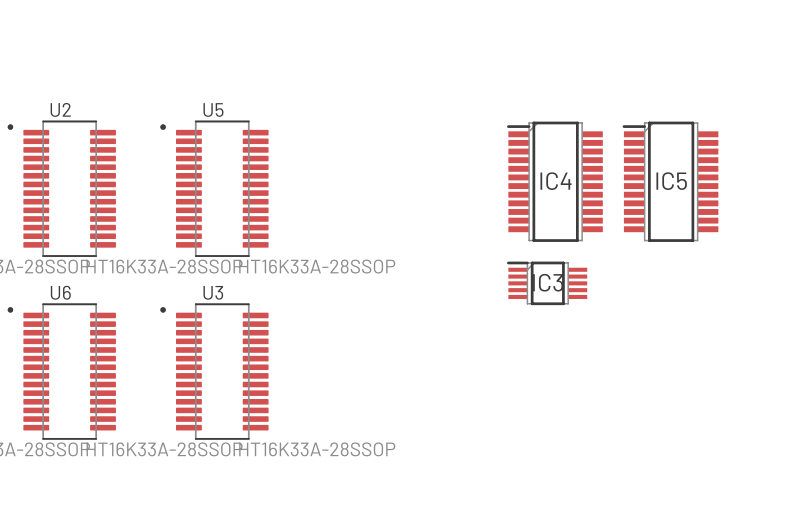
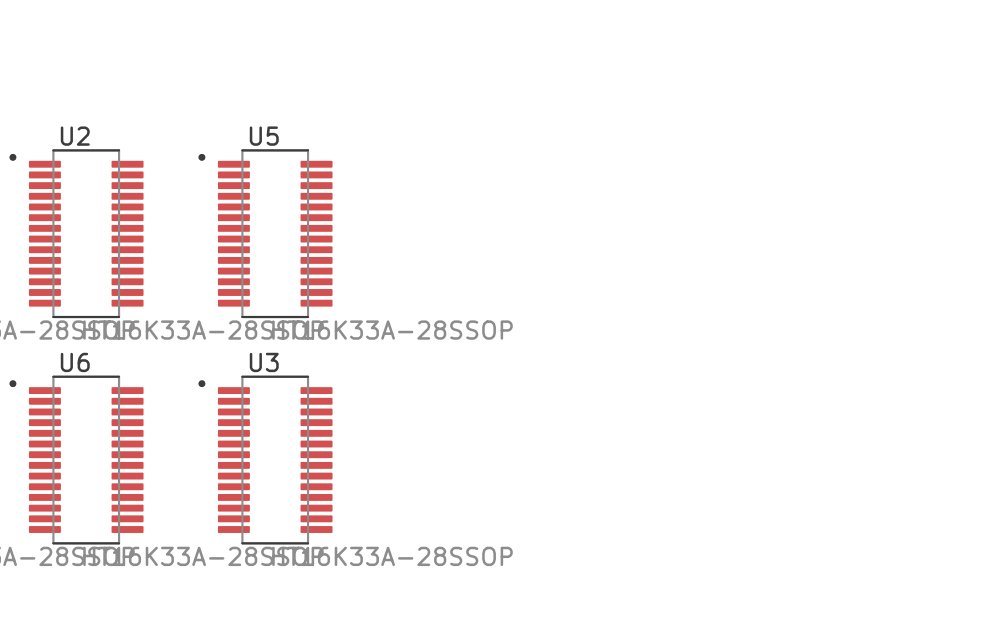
IC4: (554, 181) -> none
IC5: (670, 181) -> none
IC3: (547, 283) -> none

